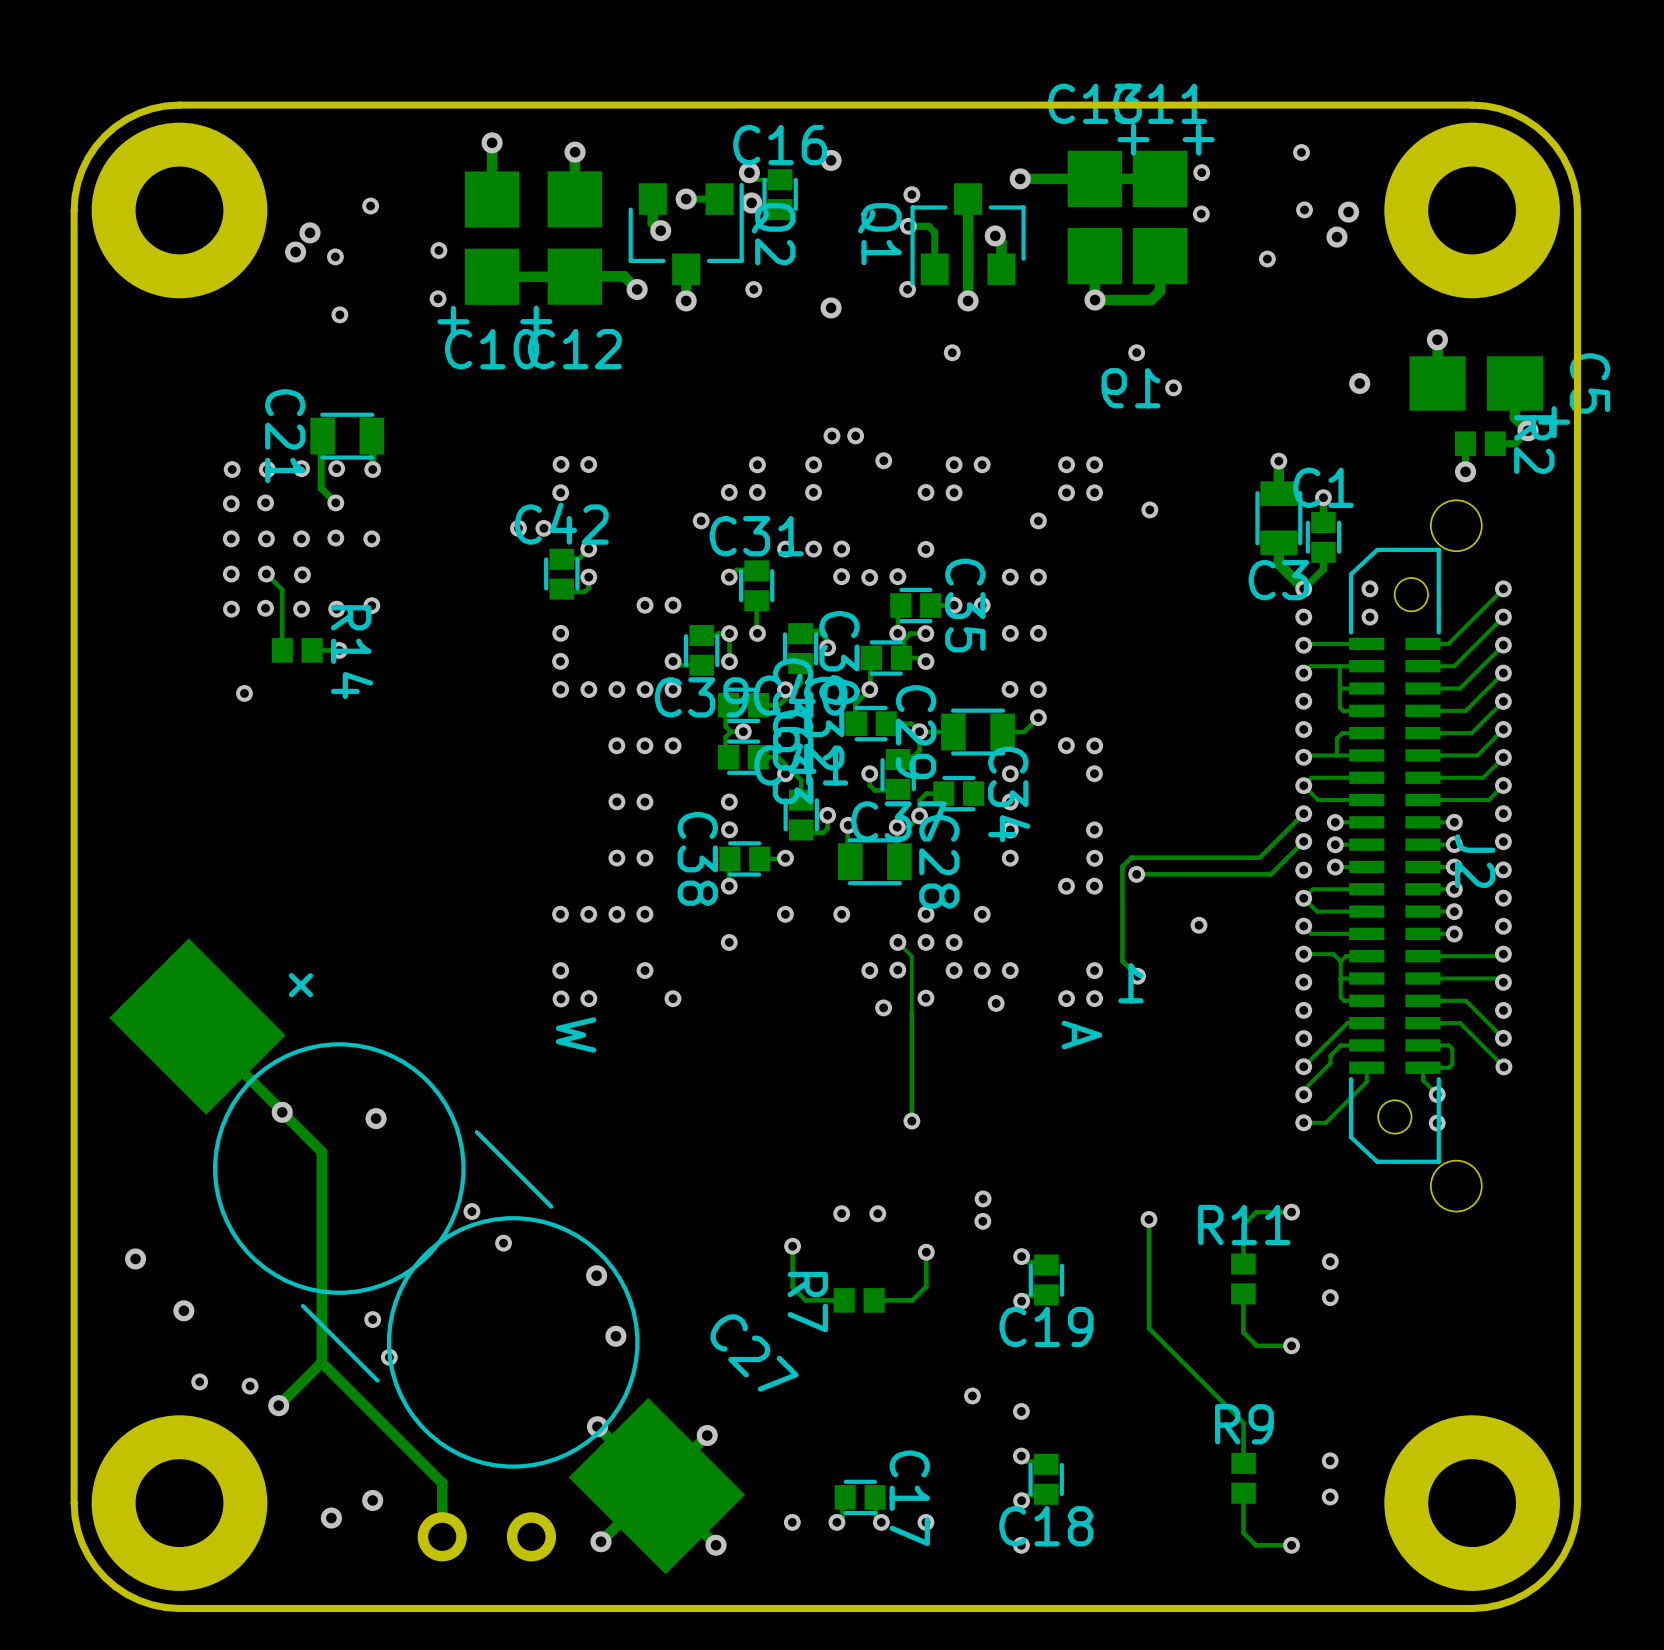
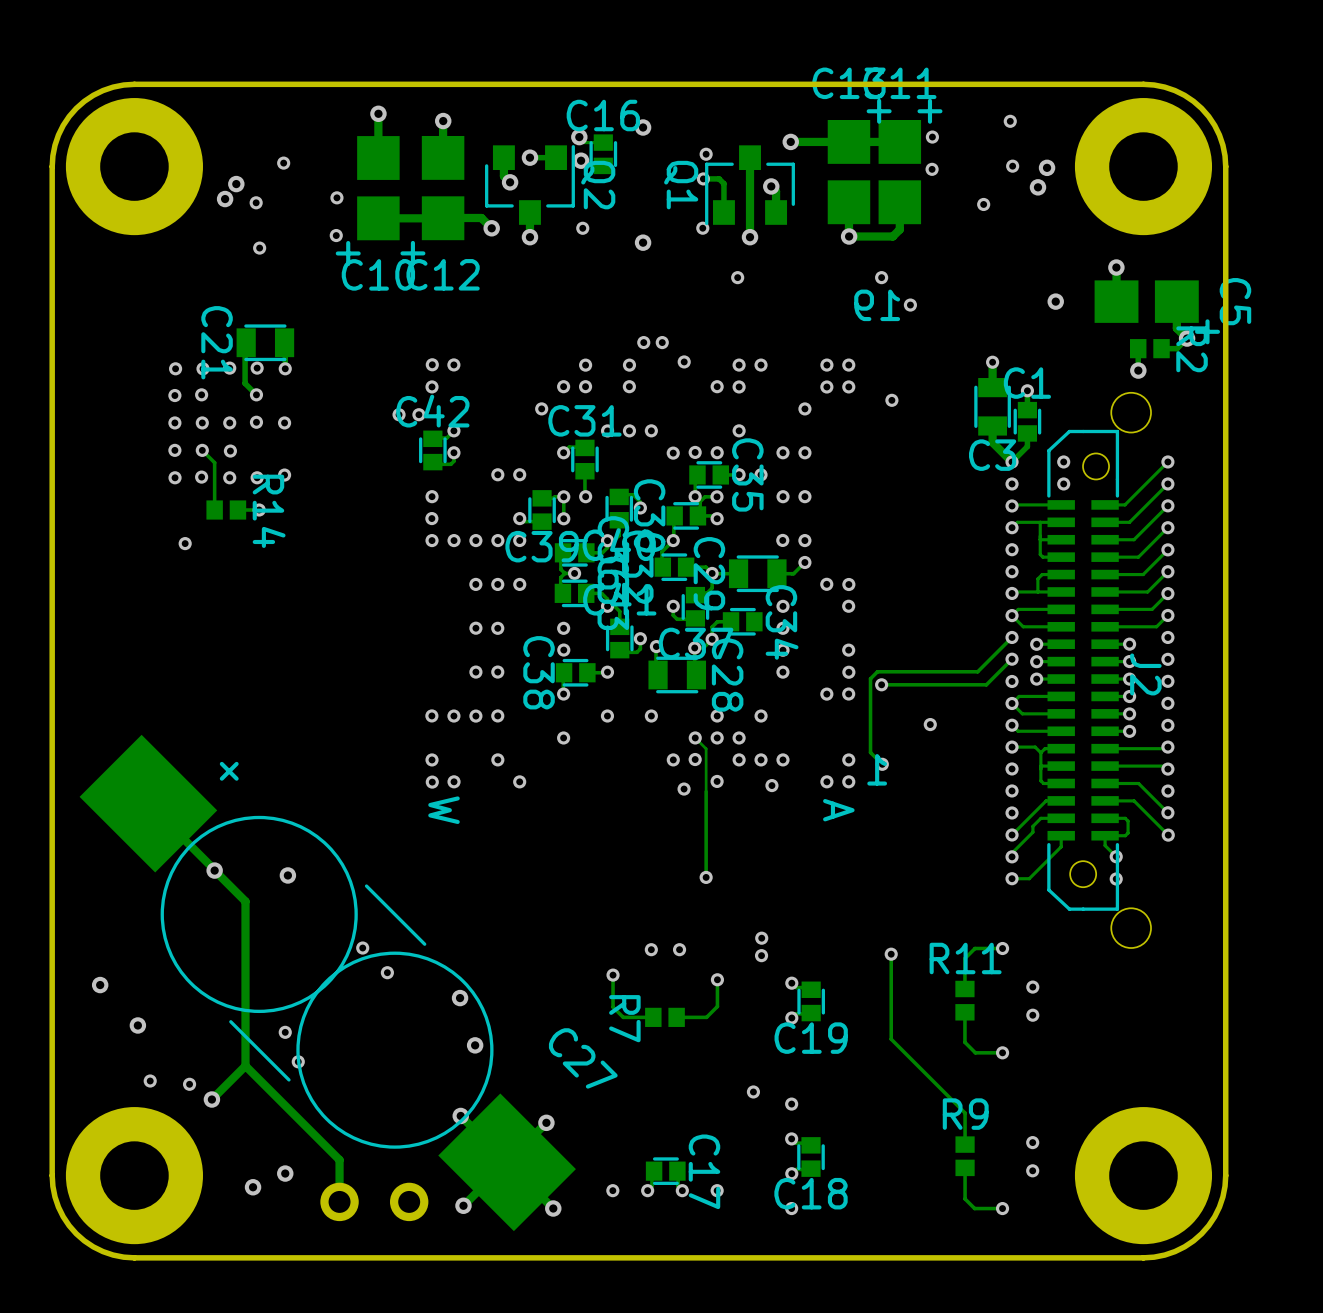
via: (925, 549) -> none
via: none -> (739, 430)
via: (841, 576) -> none
via: none -> (717, 452)

